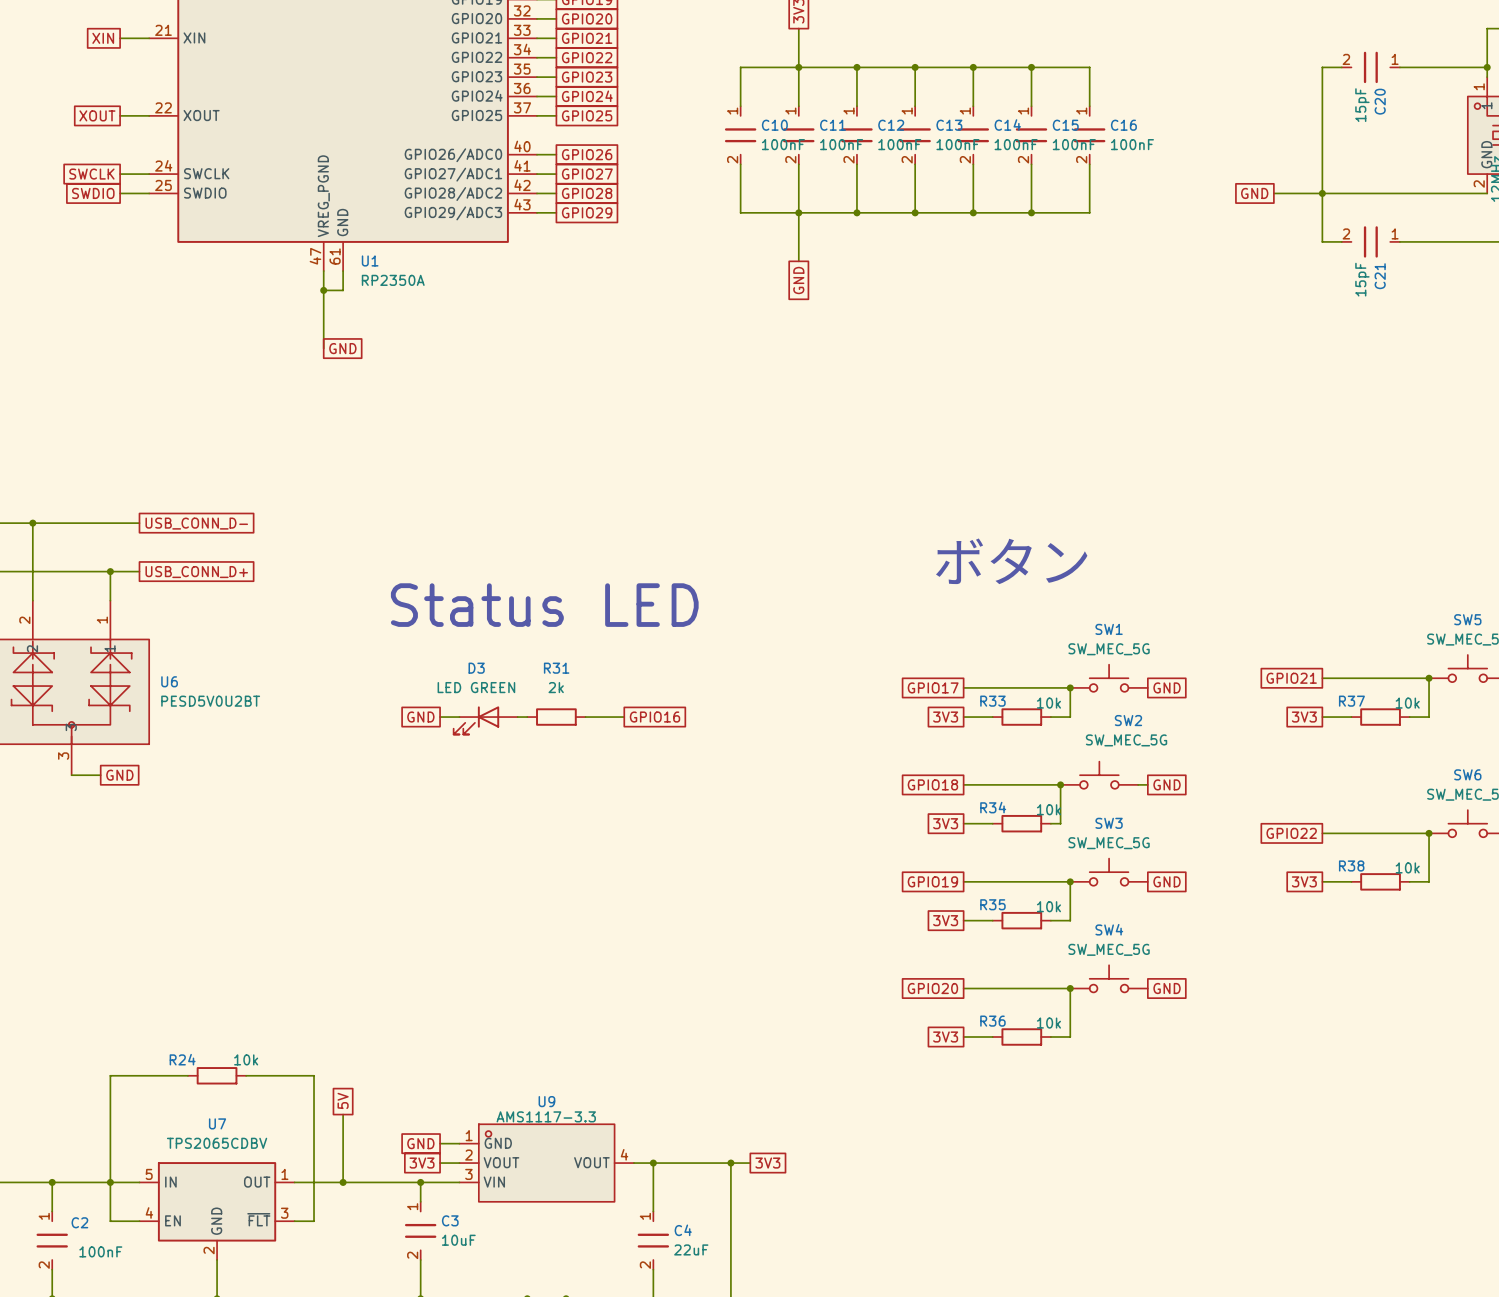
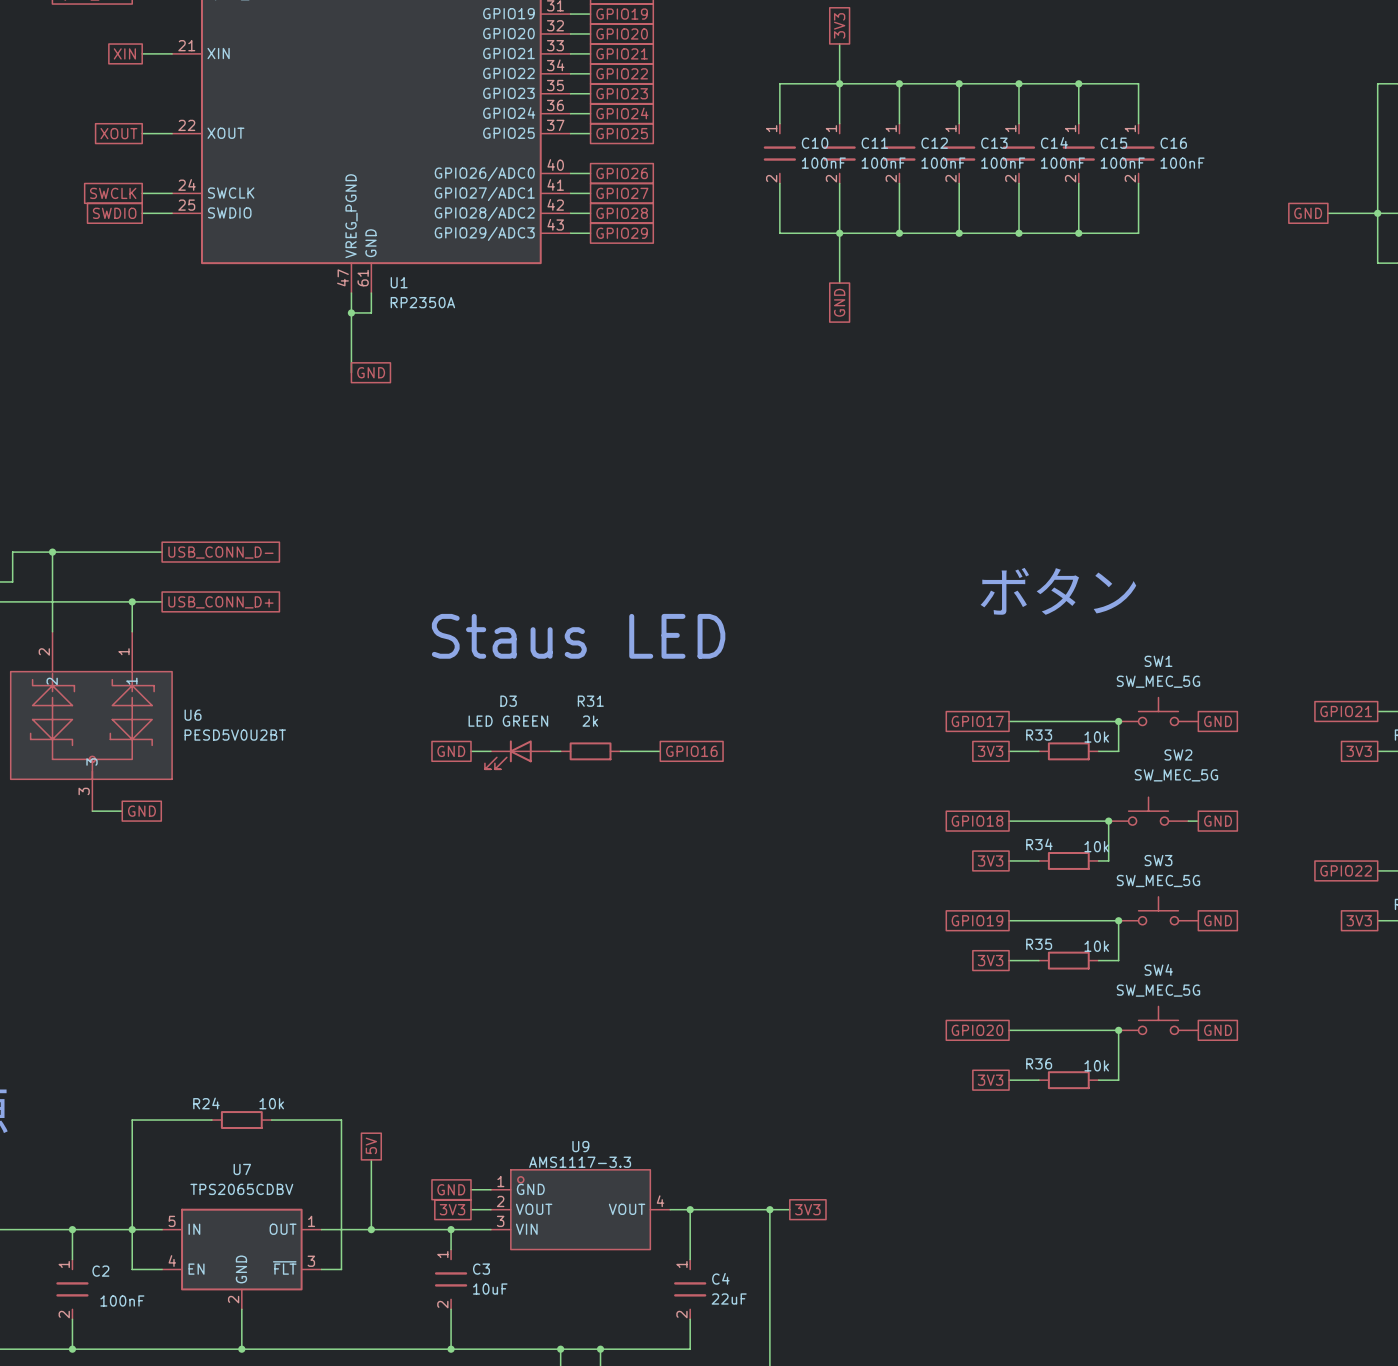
text: Status LED (544, 605) -> Staus LED (578, 636)

